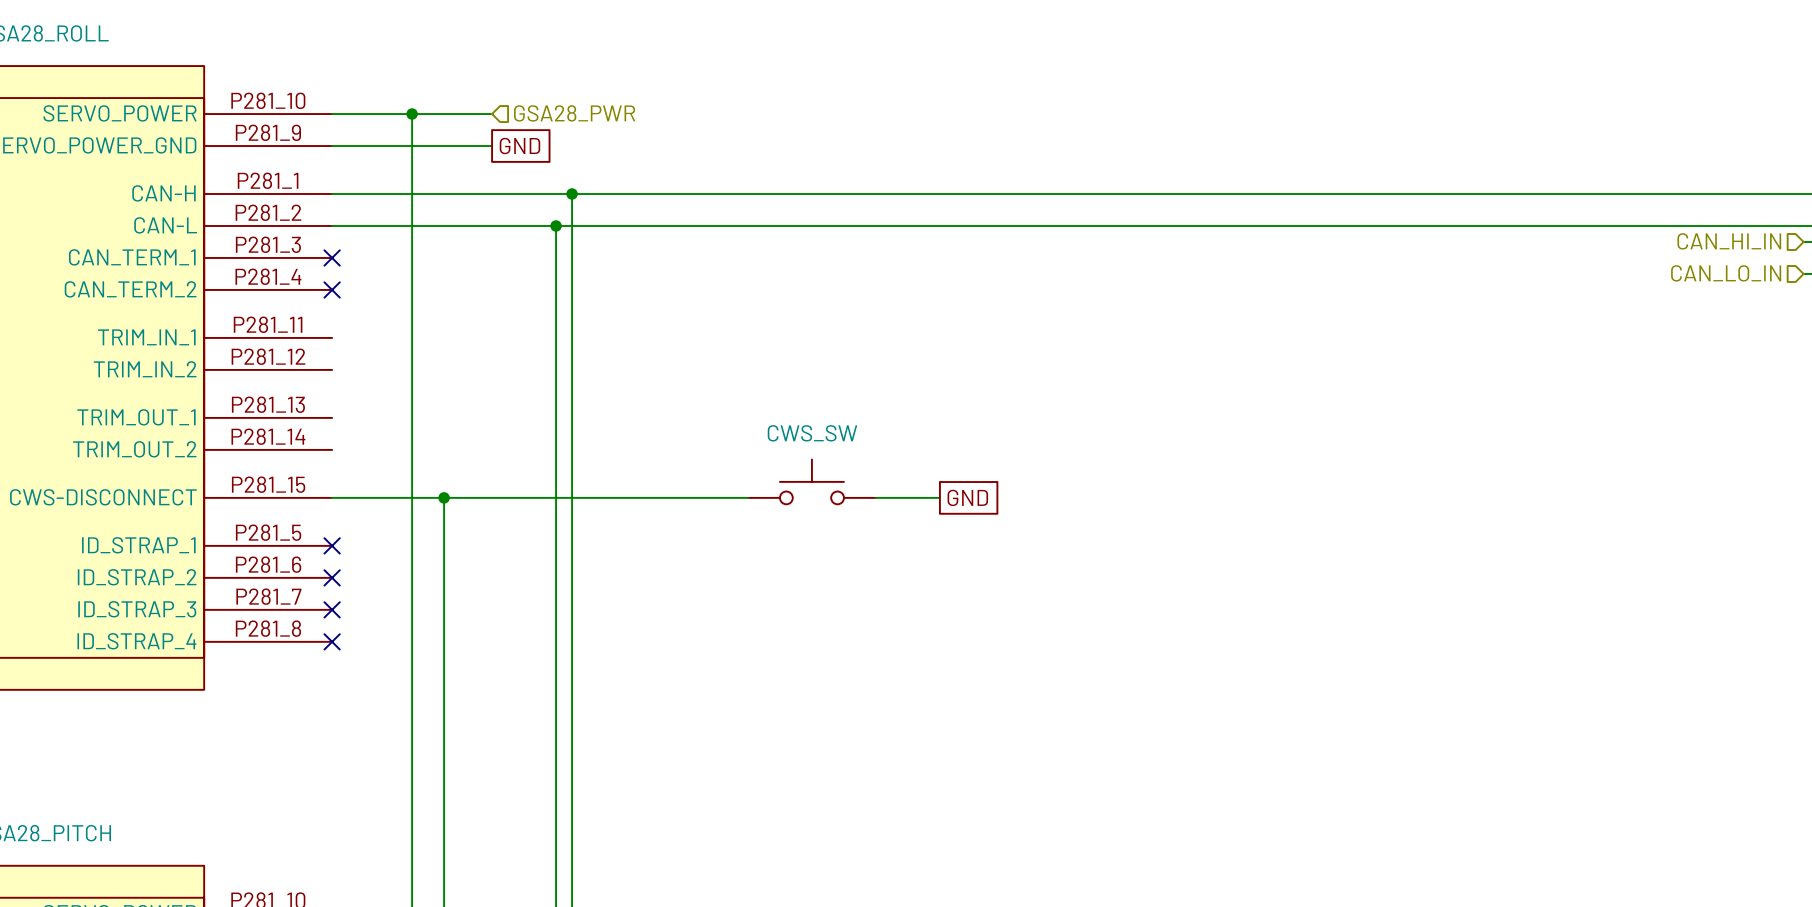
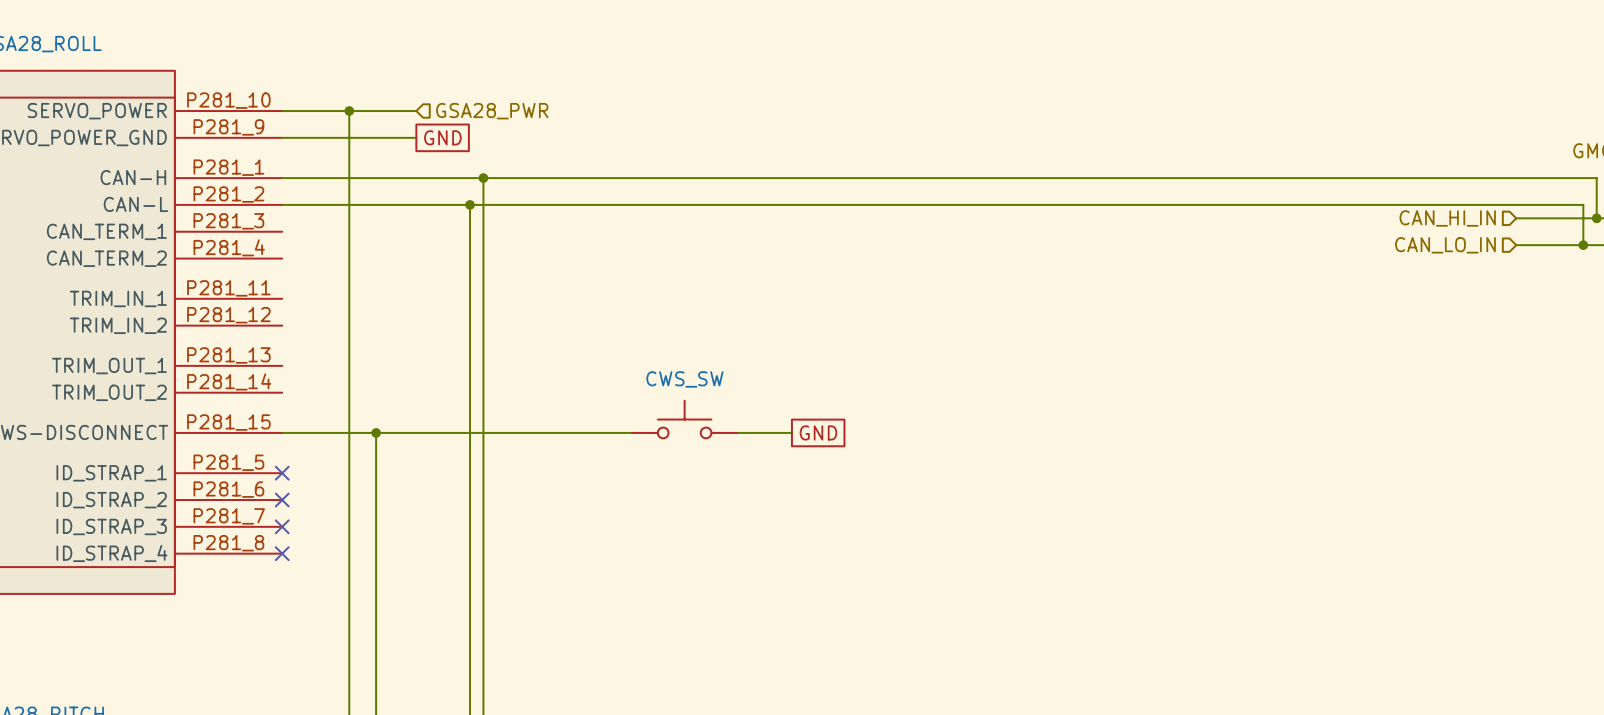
no-connect mark: (332, 257) -> none
no-connect mark: (332, 289) -> none

